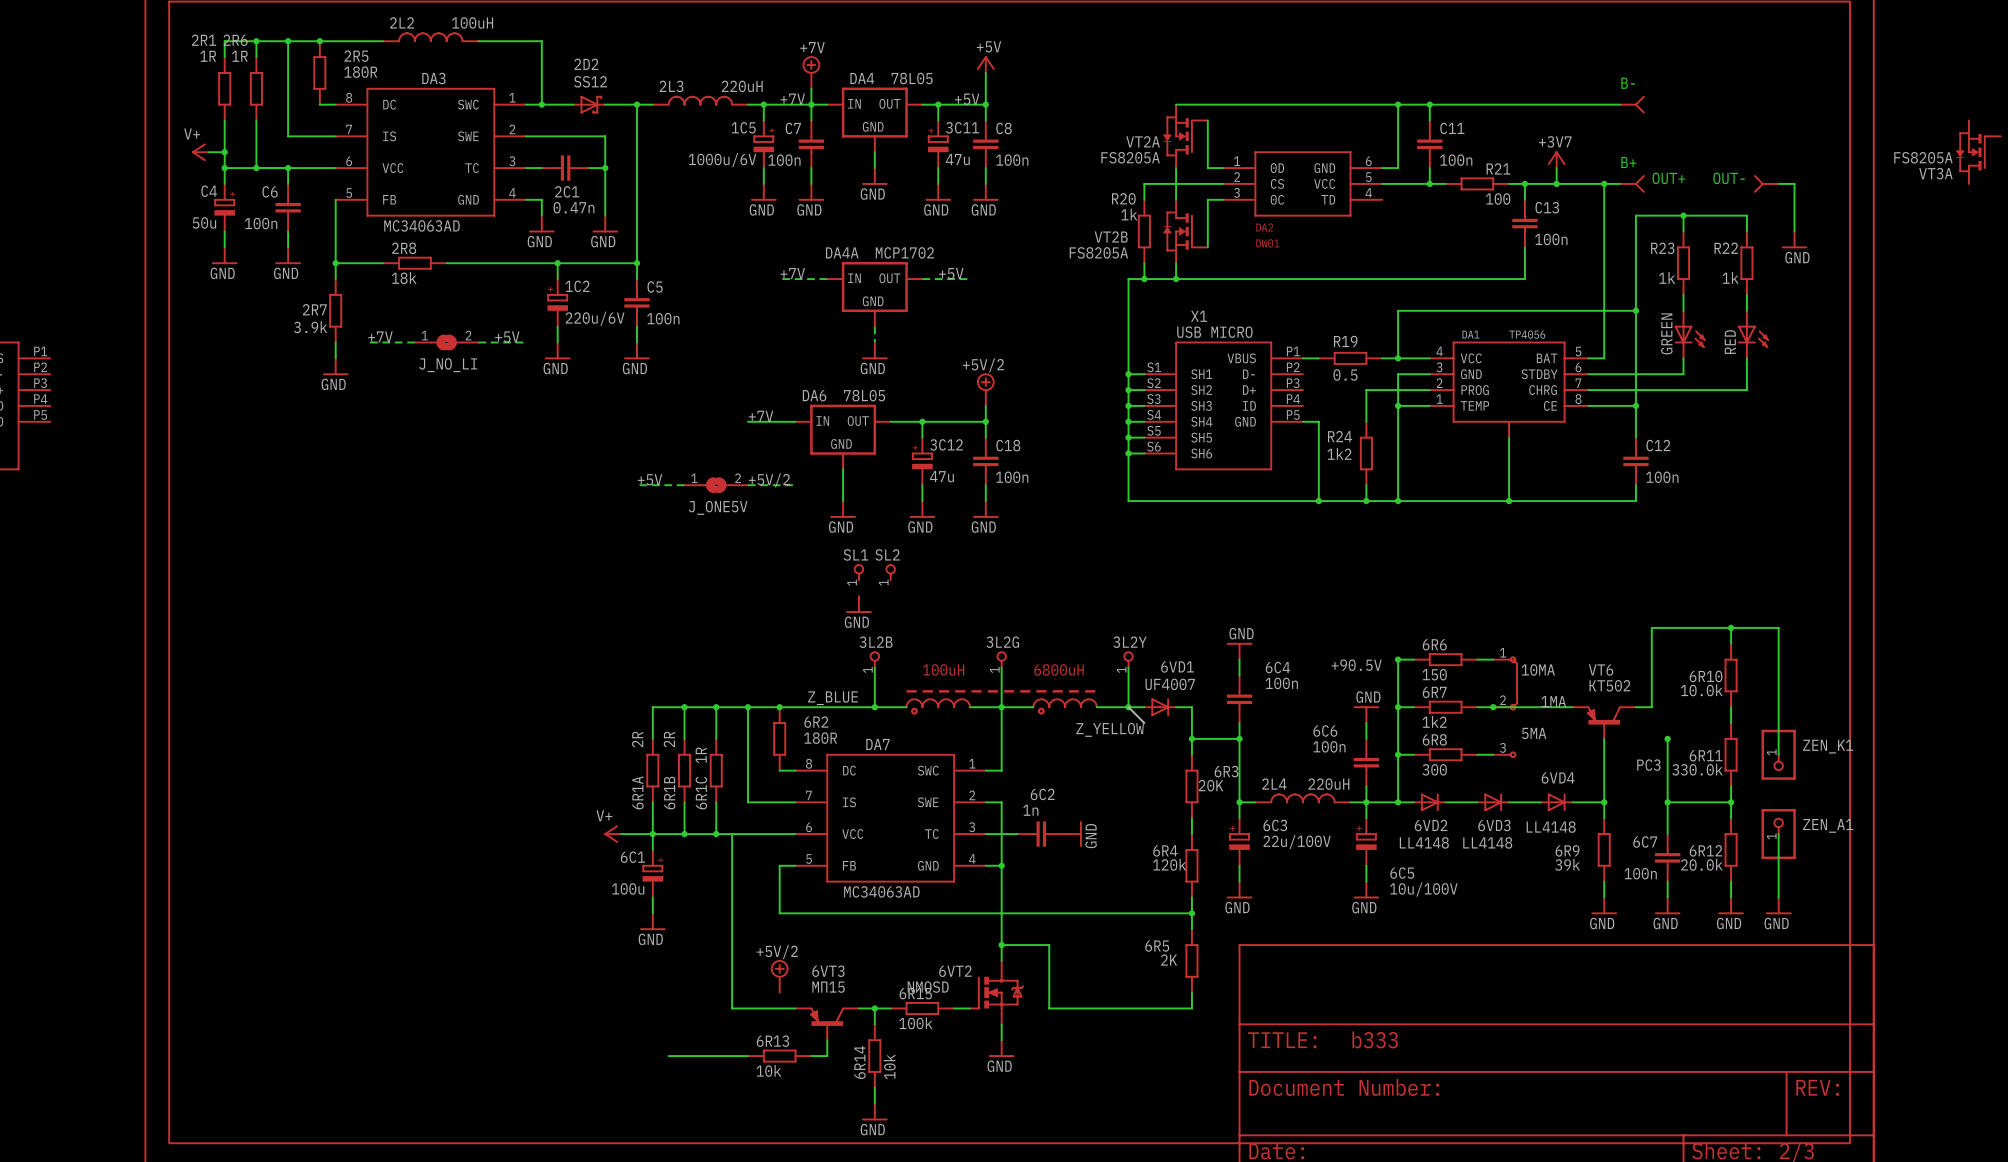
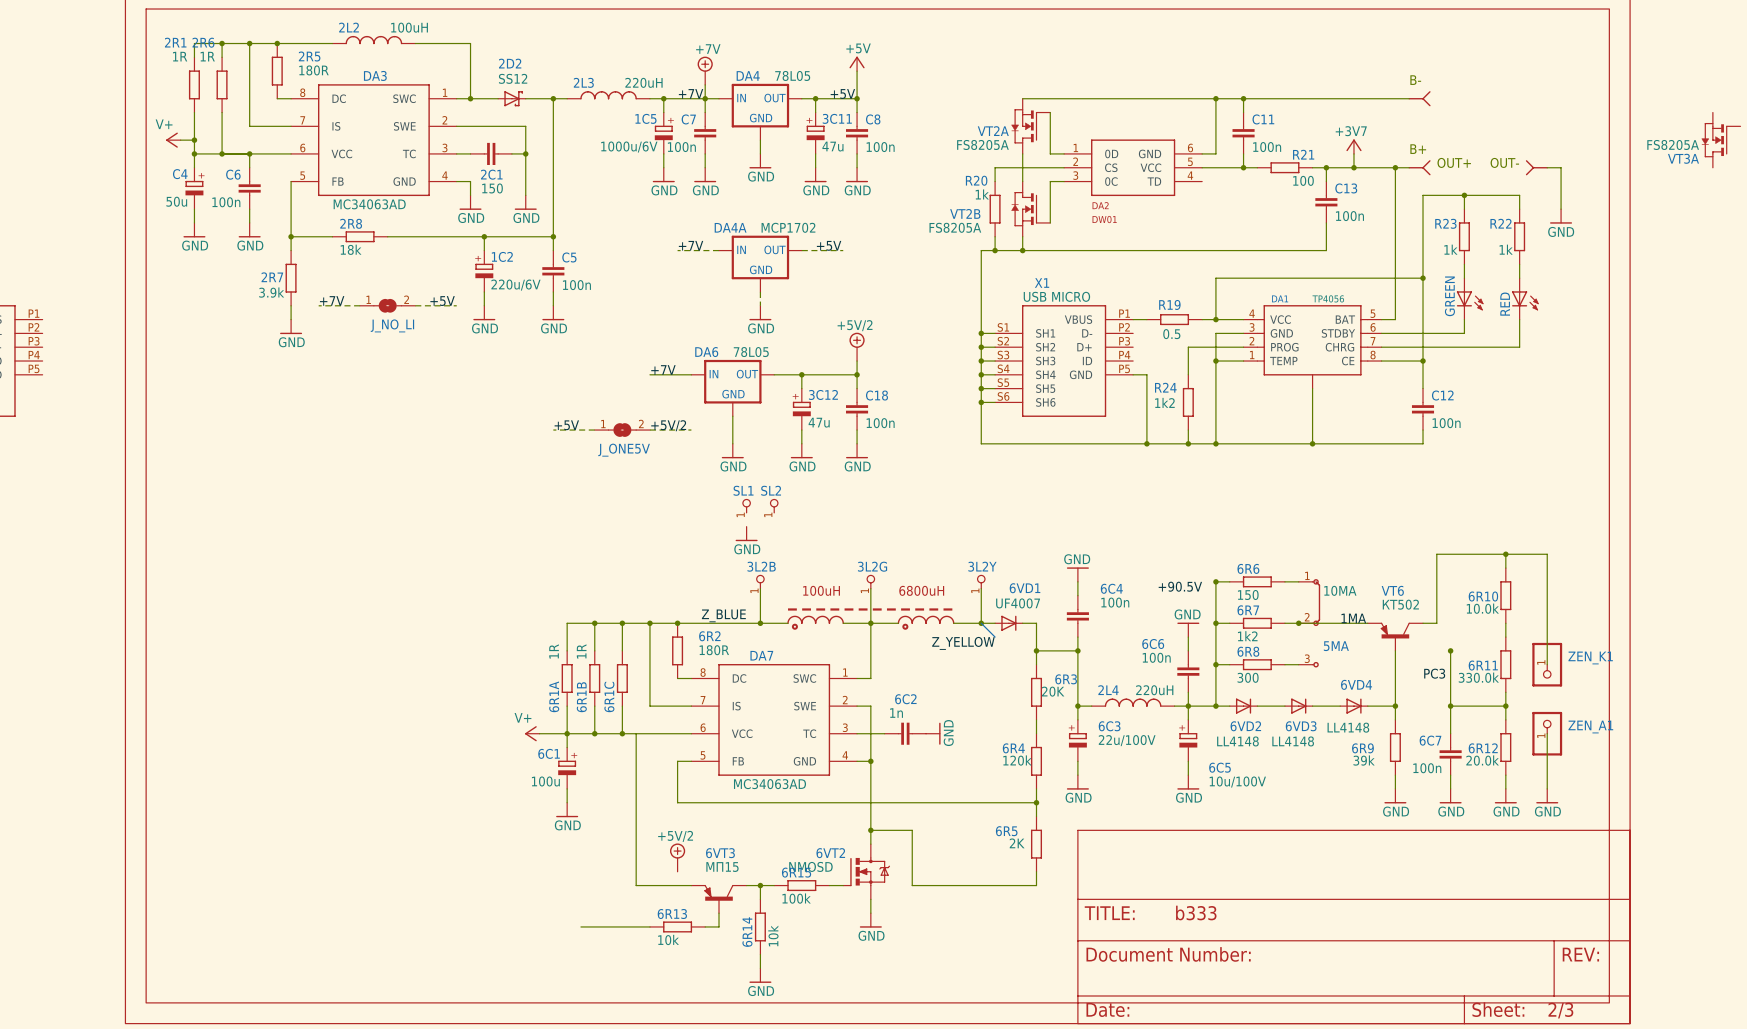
2C1 value: 0.47n (574, 207) -> 150 (492, 188)
6R1A value: 2R (637, 739) -> 1R (554, 651)
6R1B value: 2R (669, 739) -> 1R (581, 651)
6R1C value: 1R (701, 755) -> none

